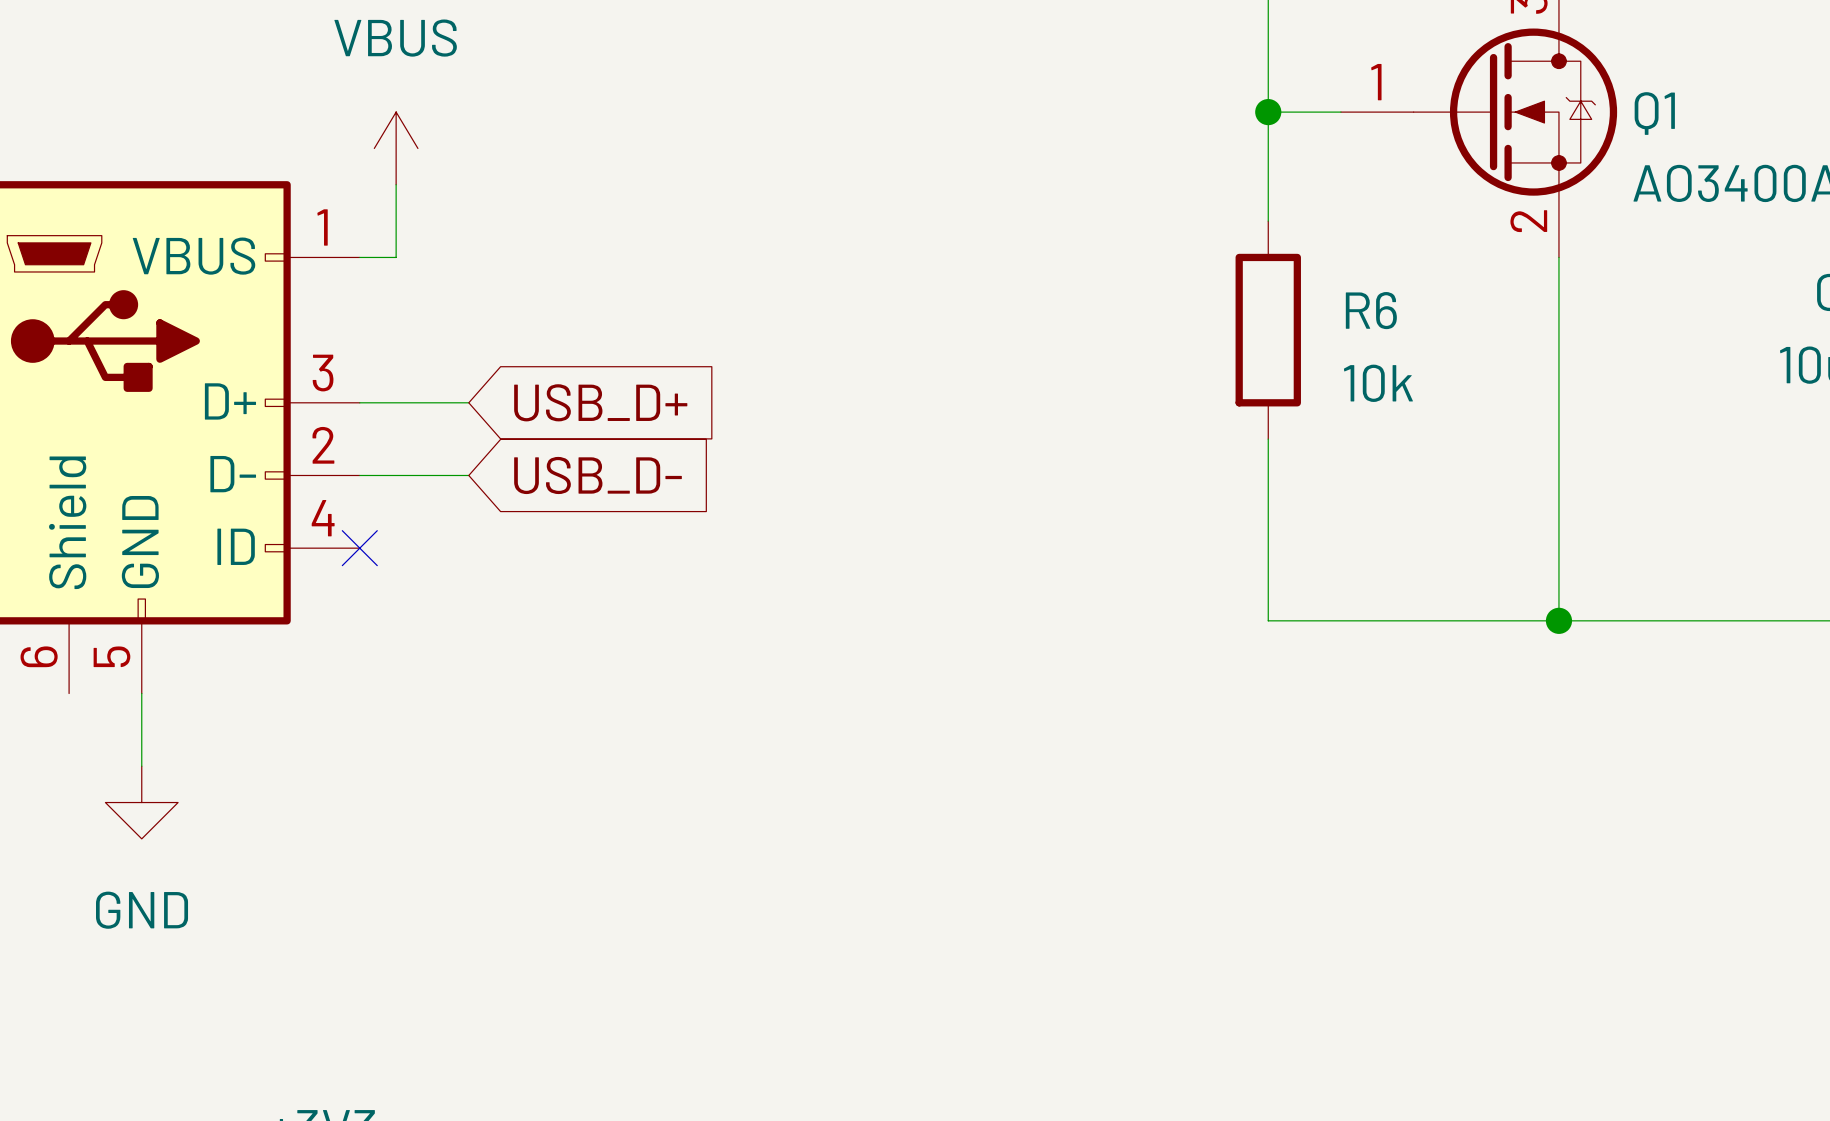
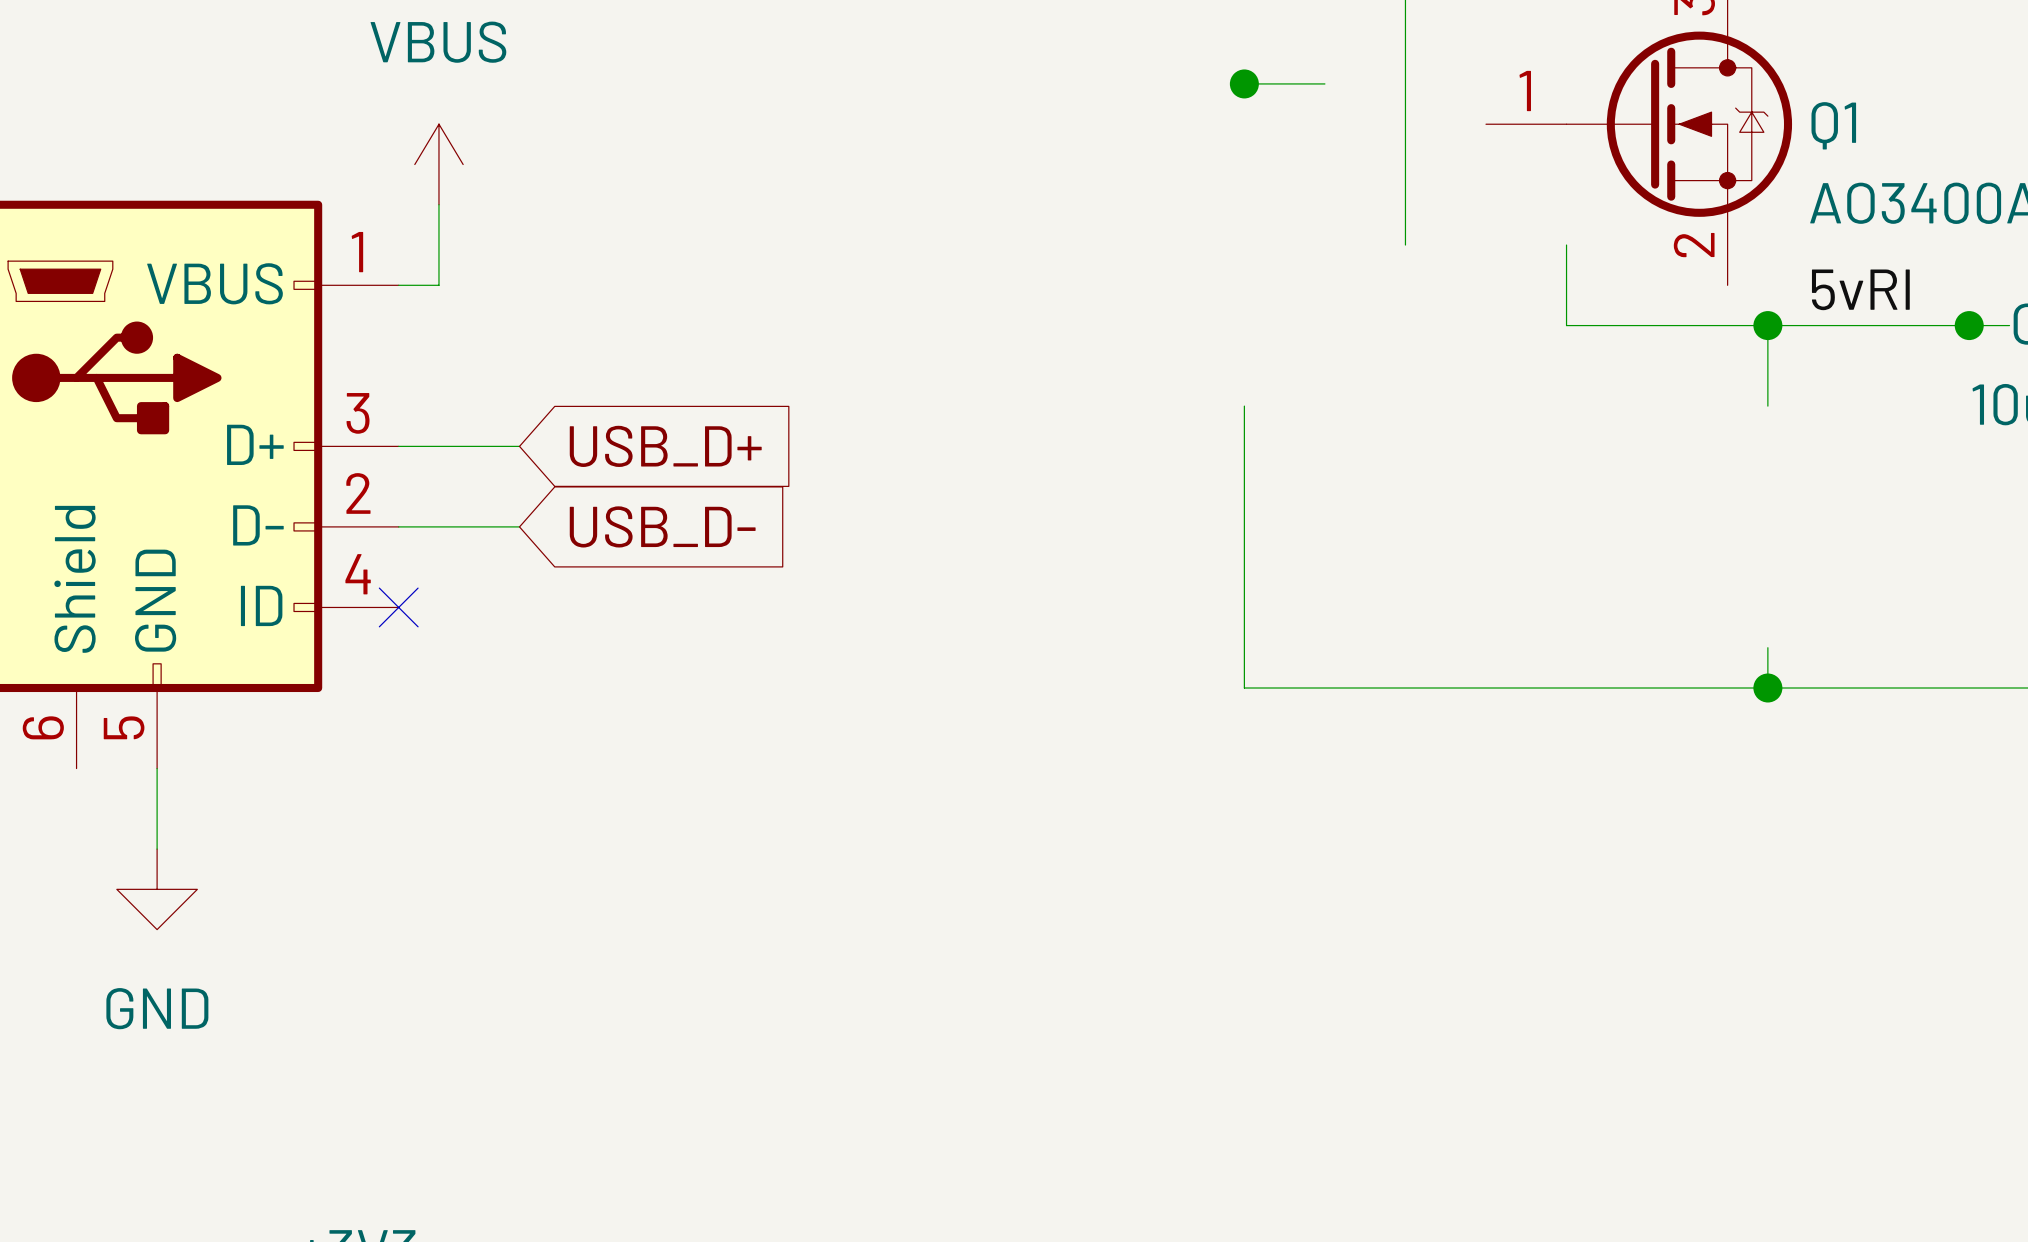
wire: (1268, 112) (1340, 112) -> (1244, 83) (1324, 83)
junction position: (1268, 112) -> (1244, 83)
wire: none -> (1566, 245) (1566, 325) (2009, 325)
wire: (1558, 257) (1558, 620) -> none
label: none -> 5vRI (1860, 289)
wire: none -> (1767, 325) (1767, 406)
junction: none -> (1767, 325)
junction: none -> (1969, 325)
R6: 10k (1268, 330) -> none
wire: (1268, 439) (1268, 620) -> (1244, 406) (1244, 688) (1405, 688)
wire: none -> (1767, 647) (1767, 688)
junction position: (1558, 620) -> (1767, 688)

